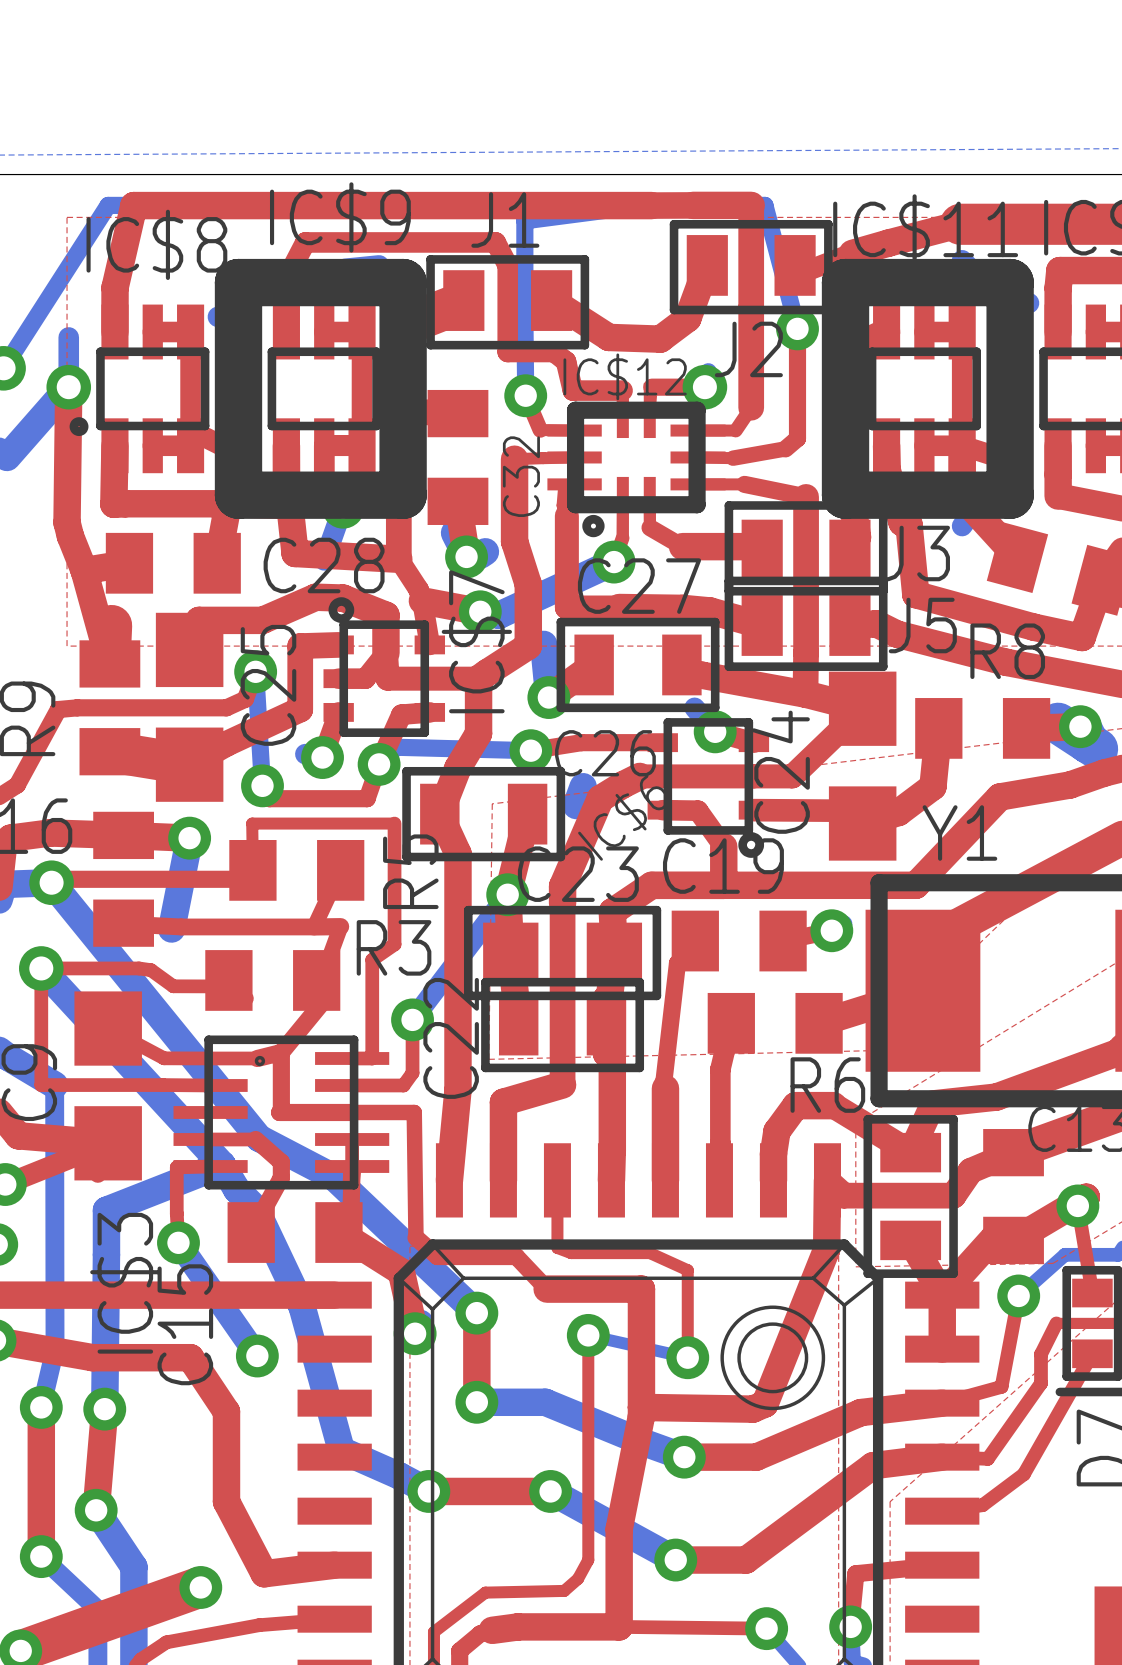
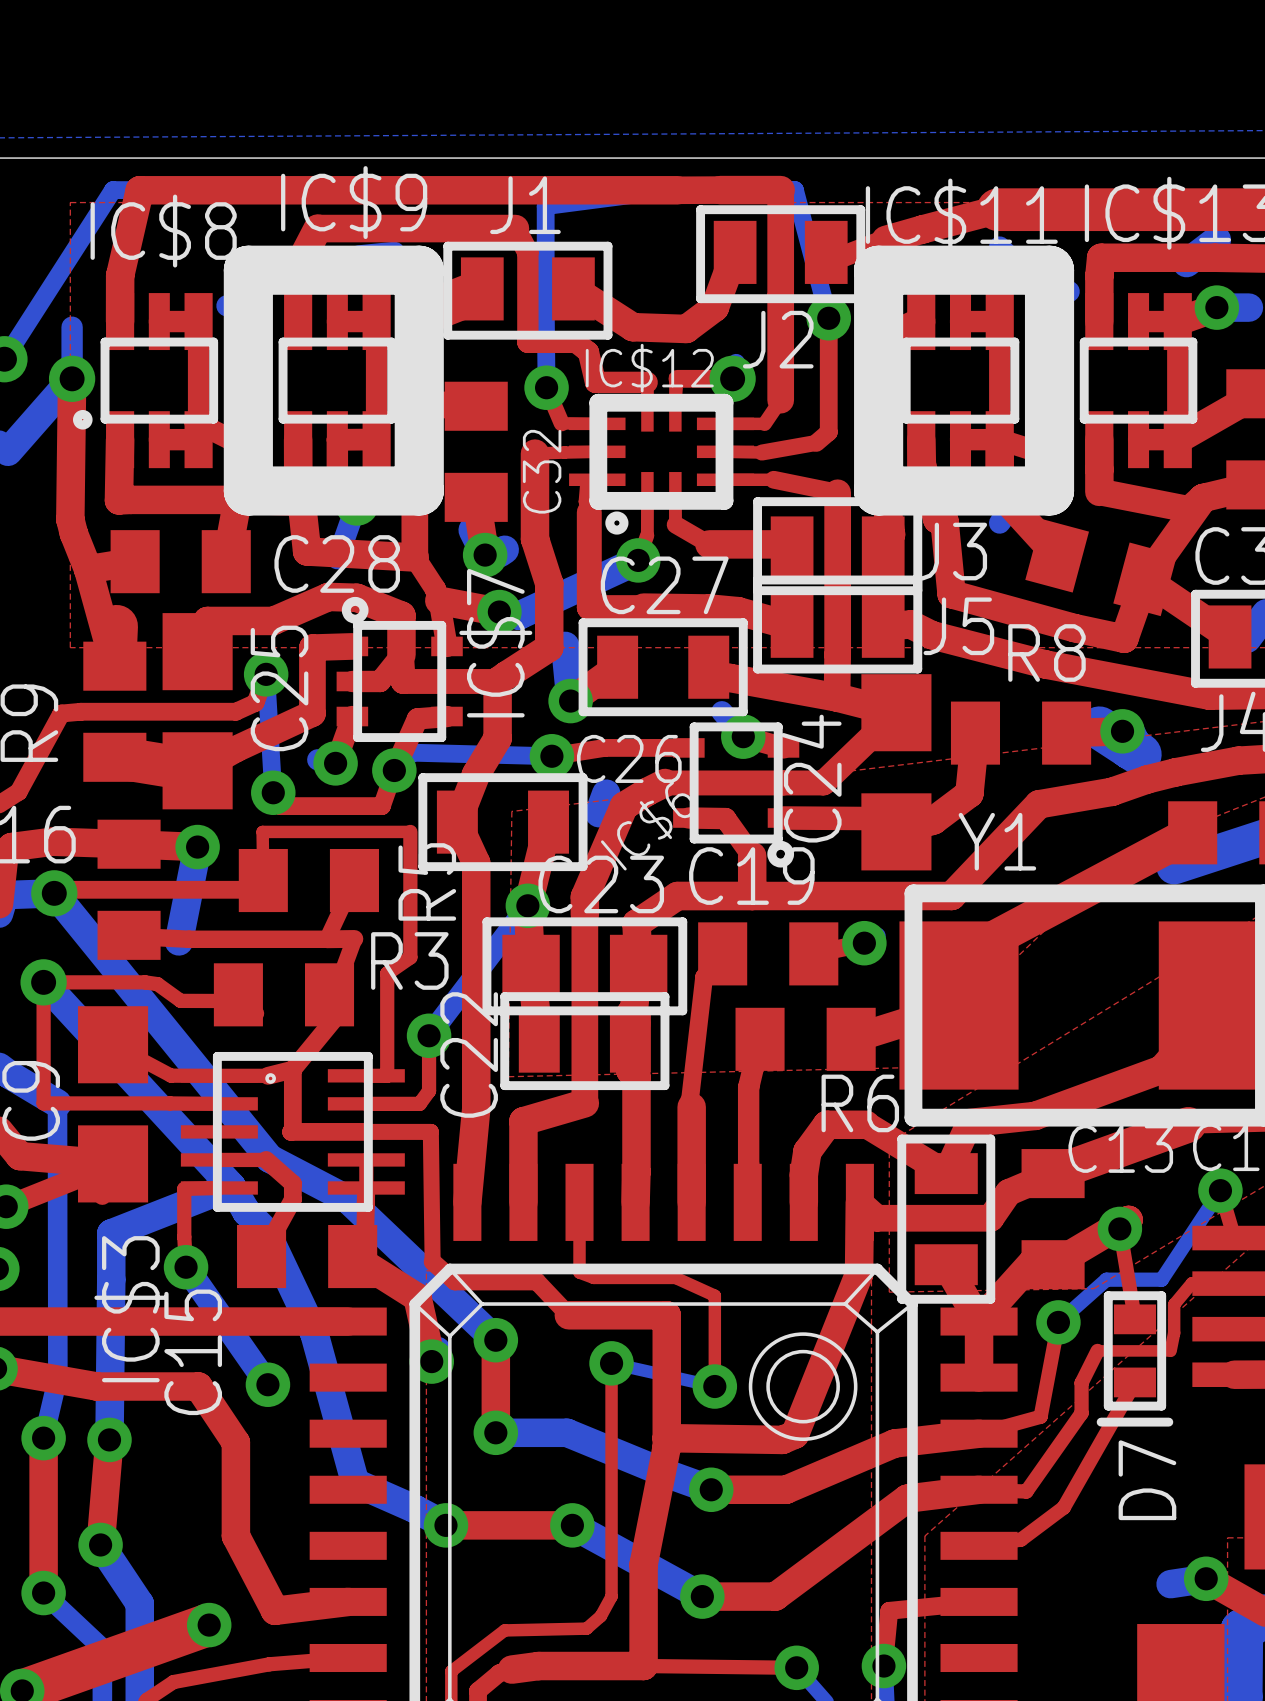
top track width: thin (495, 242) (305, 242) (291, 268) -> thick (515, 228) (317, 228) (303, 255)

